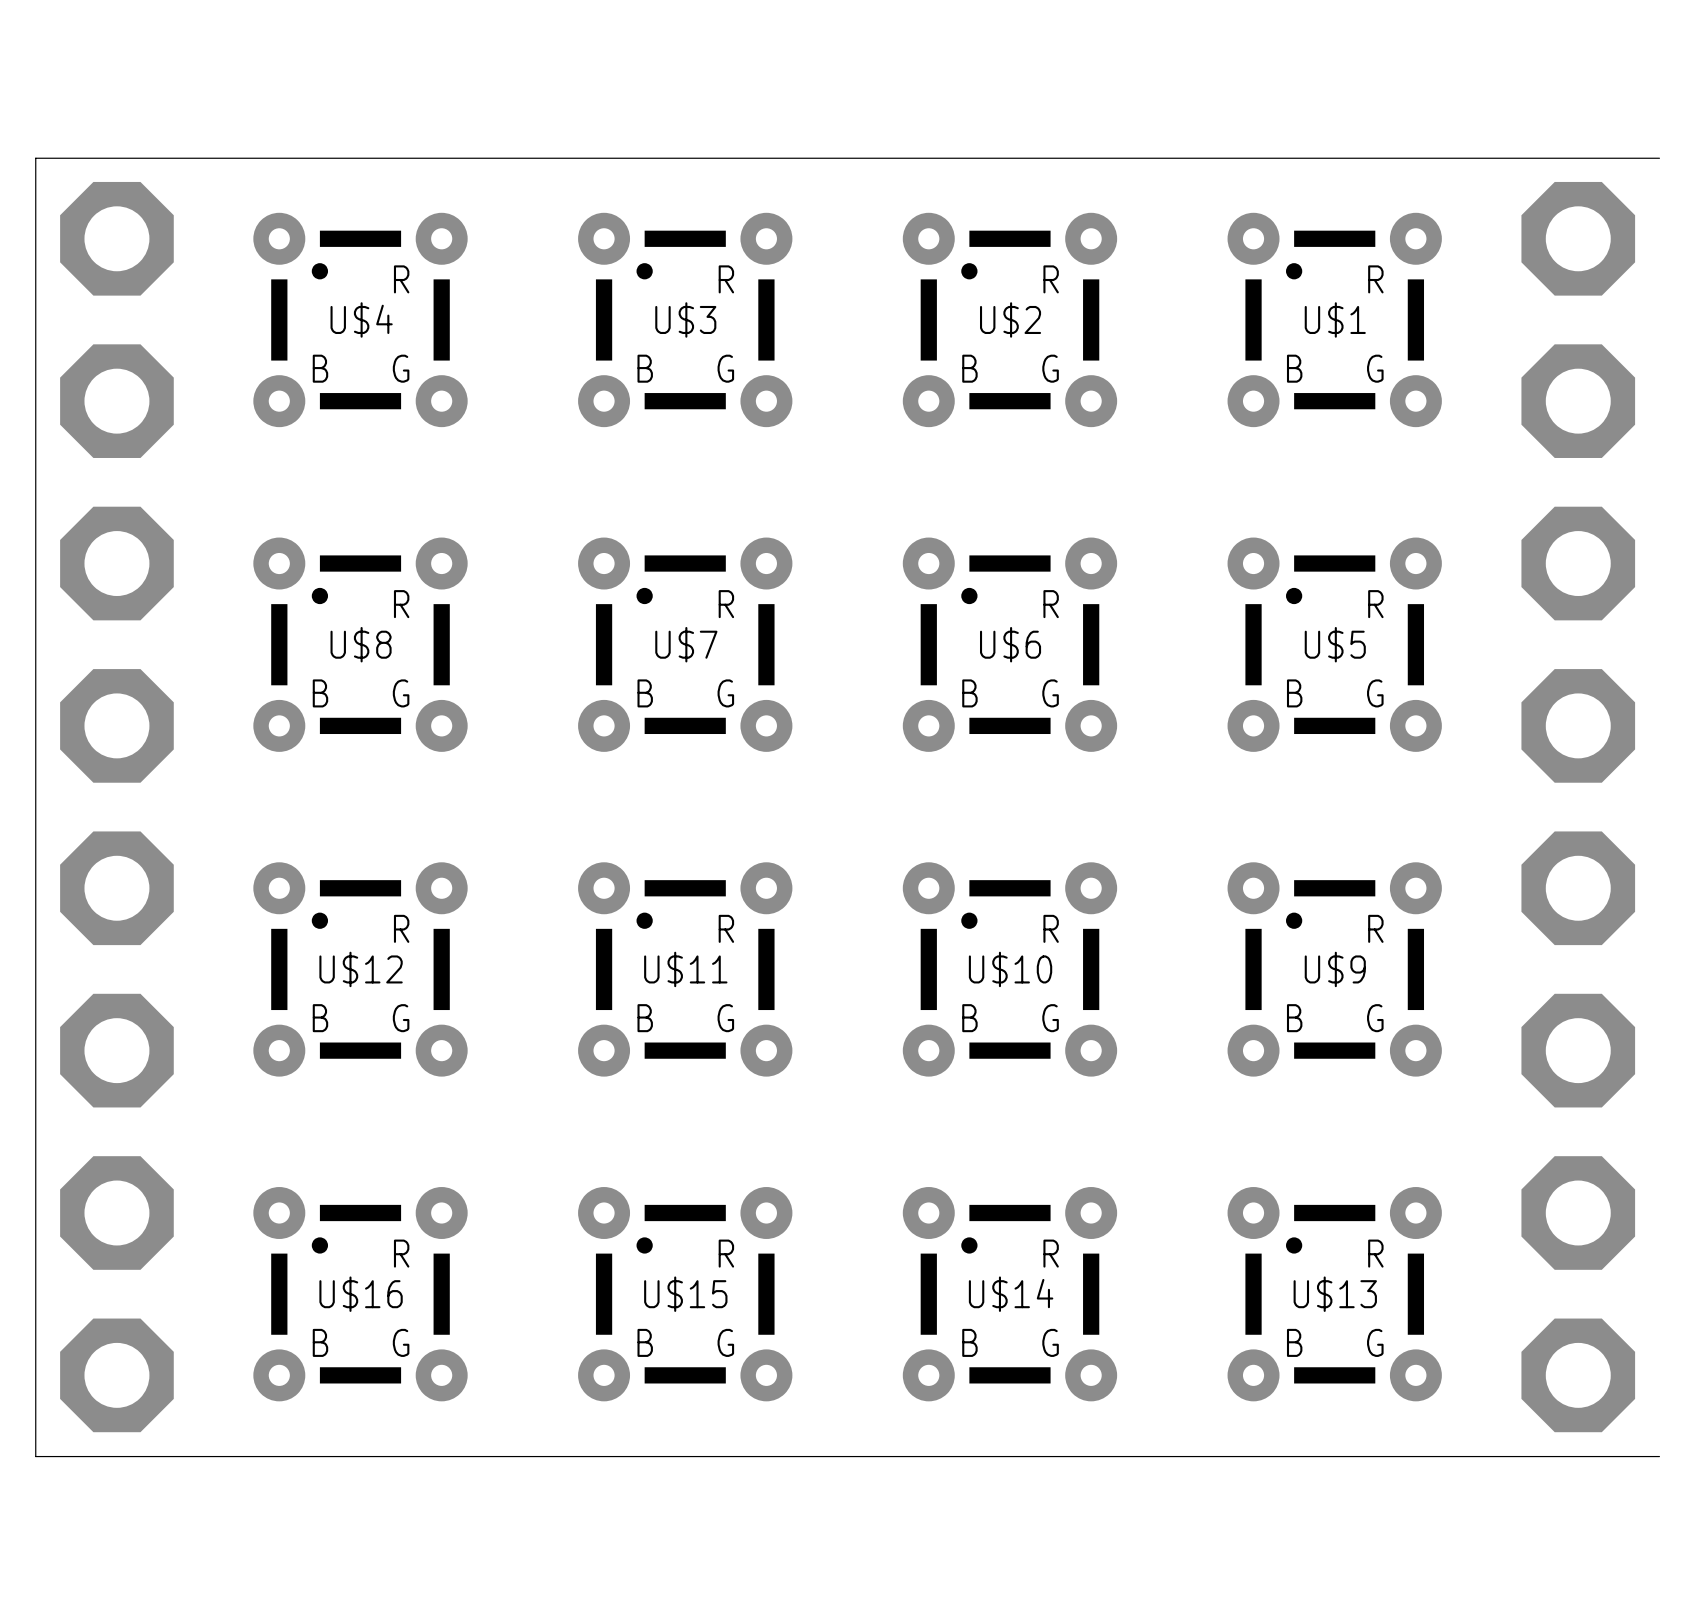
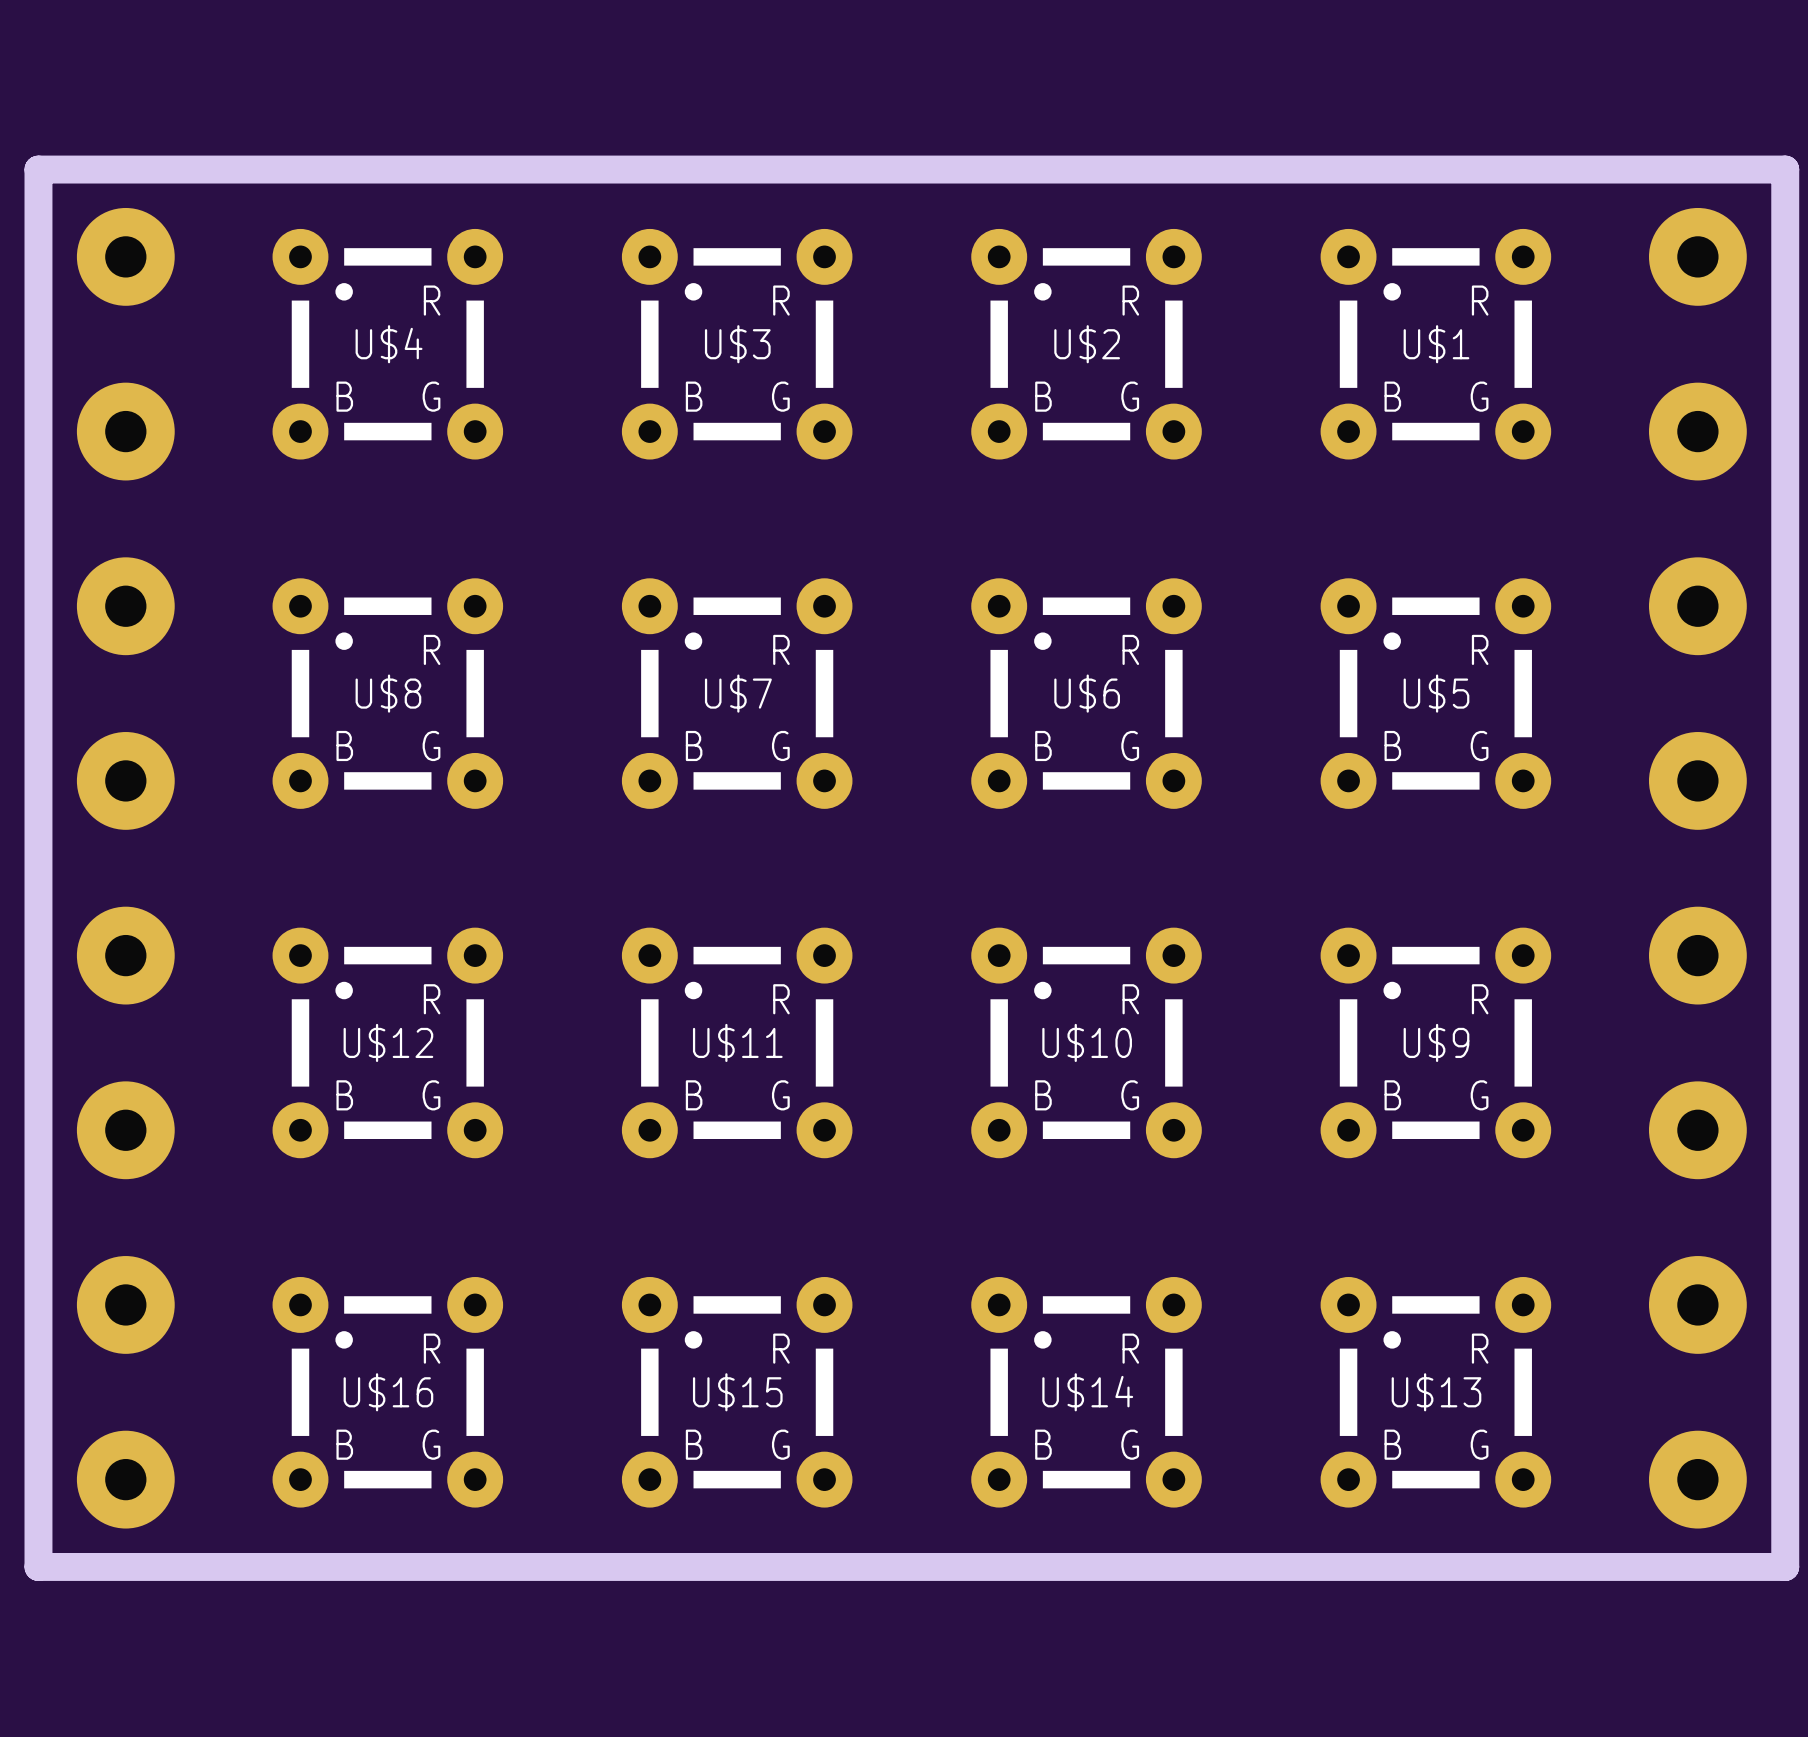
board edge width: thin (35, 158) (35, 1456) (1659, 1456) -> thick (38, 170) (38, 1566) (1785, 1566)
board edge: (1659, 158) (35, 158) -> (1785, 1566) (1785, 169) (38, 169)
part footprint: [60, 181, 174, 1433] -> [76, 207, 175, 1529]
part footprint: [1521, 181, 1636, 1433] -> [1648, 207, 1747, 1529]

